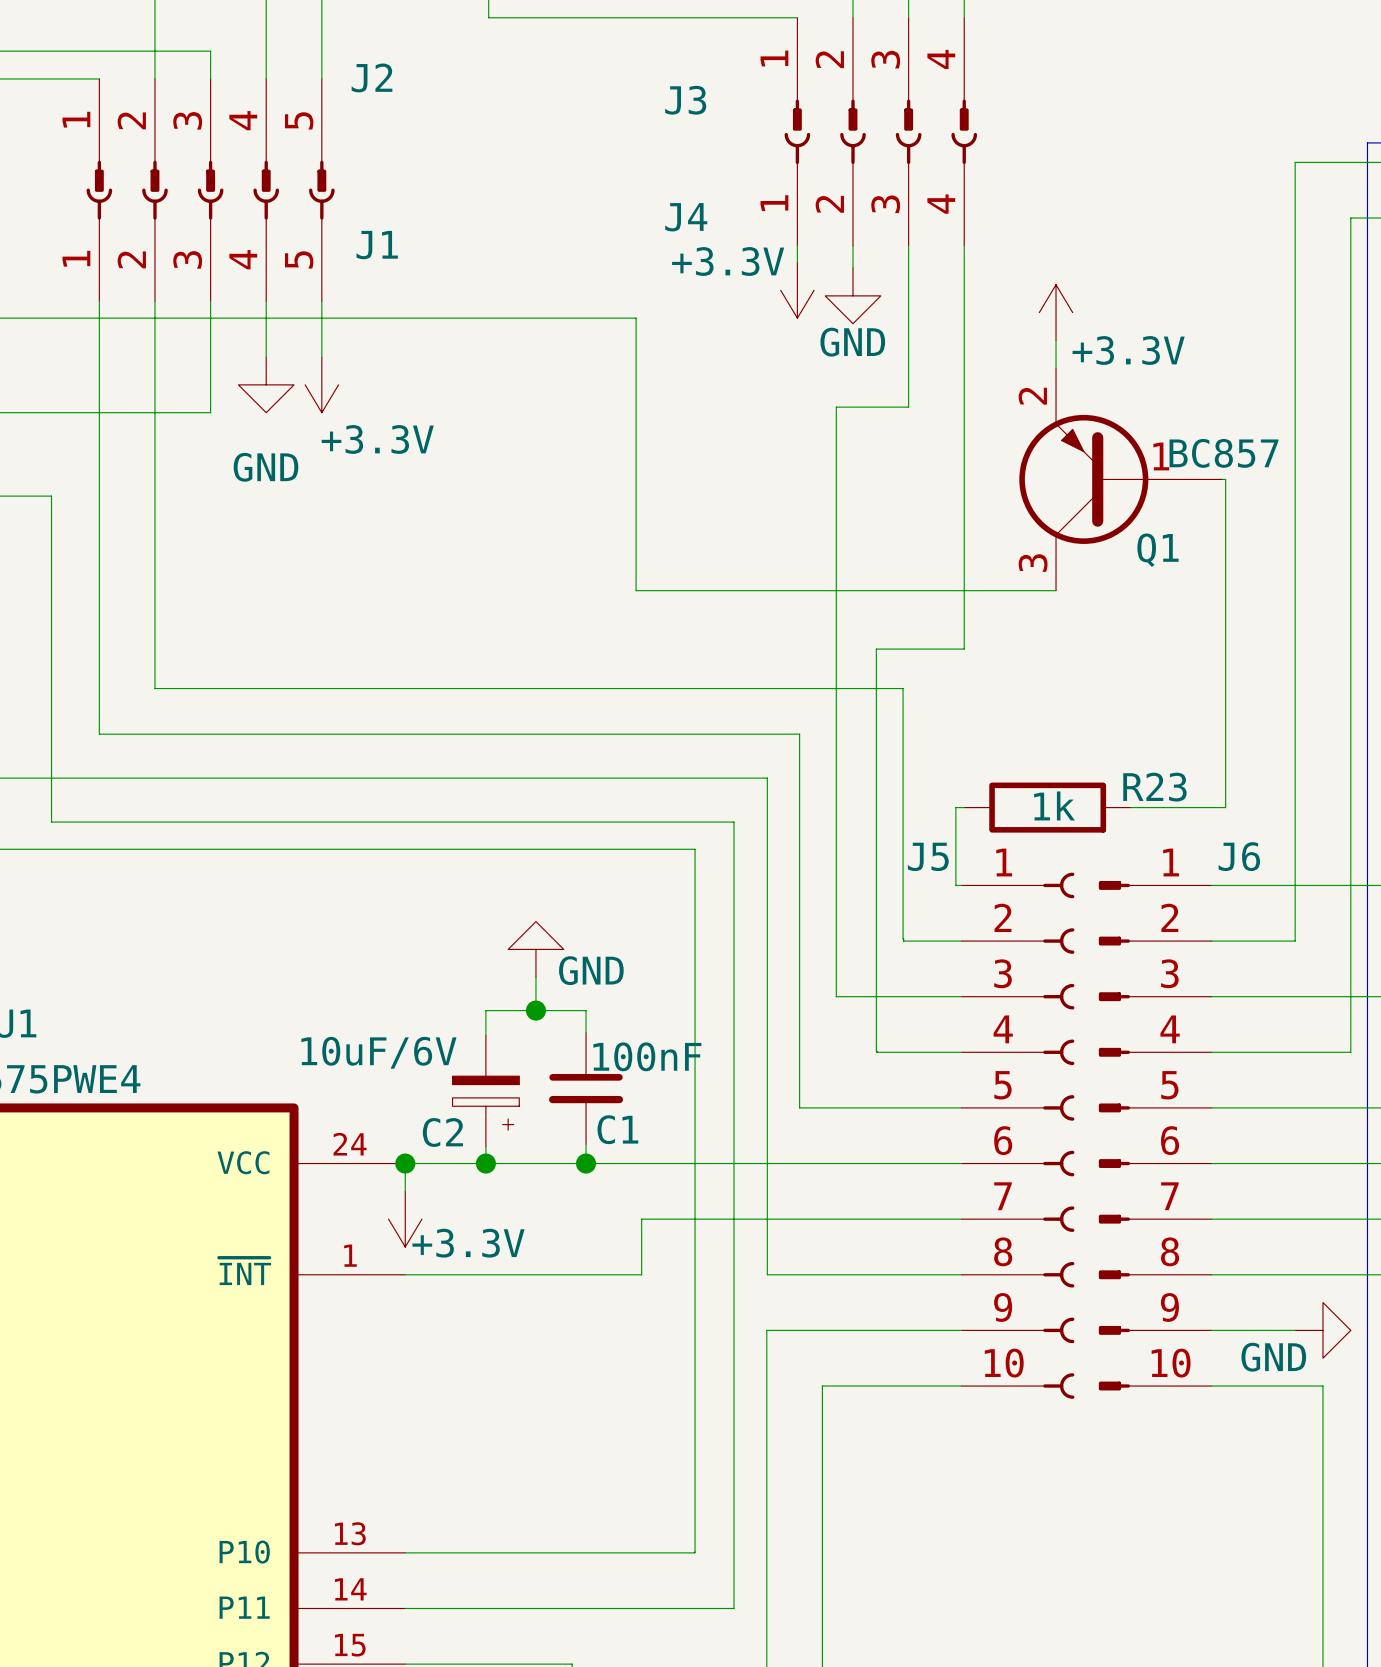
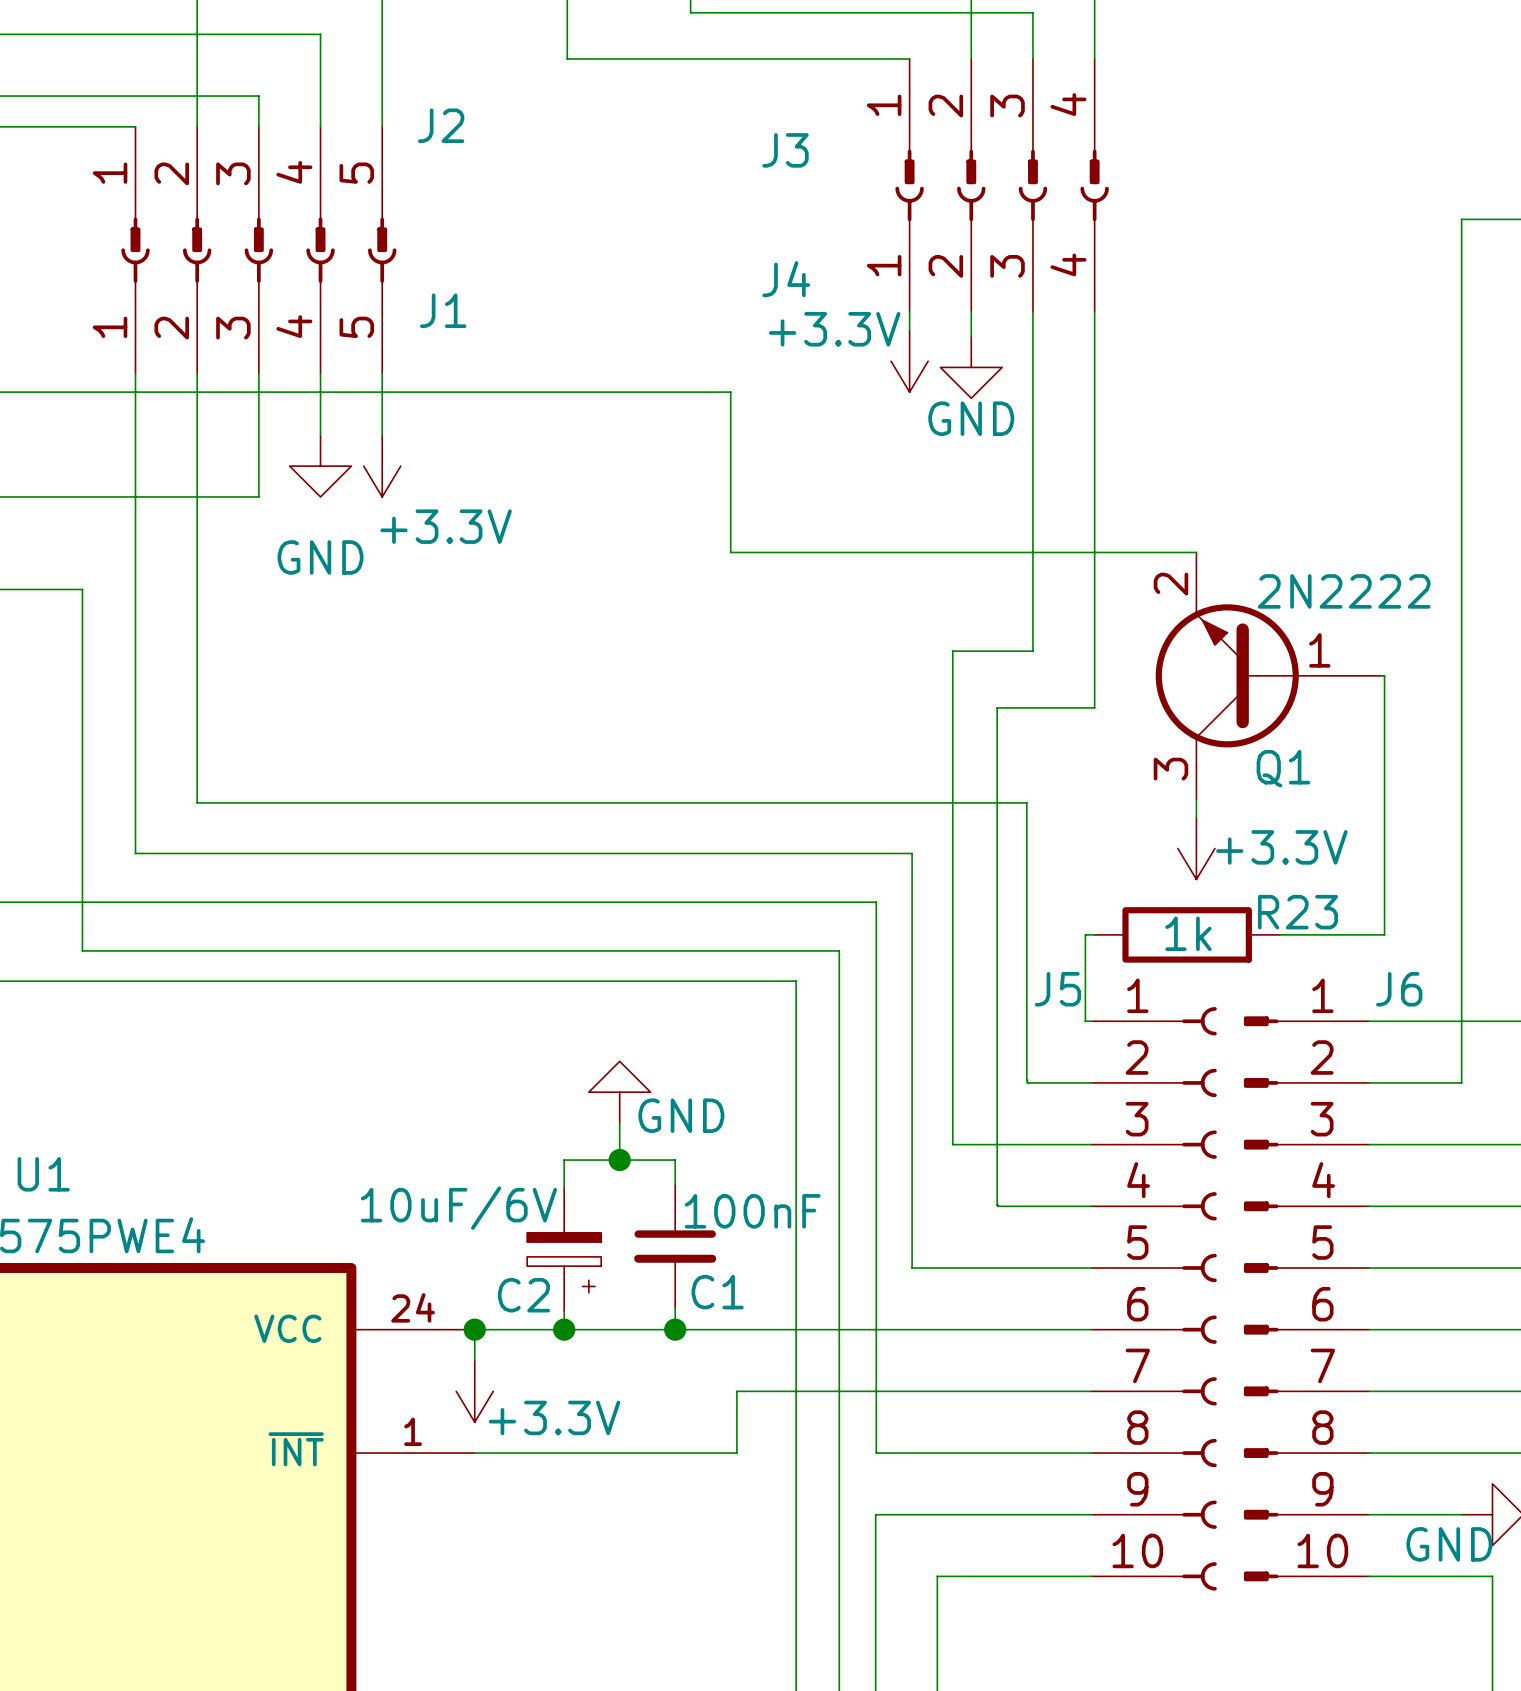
power symbol rotation: 0° (1056, 312) -> 180° (1196, 848)
power symbol position: +3.3V (1056, 312) -> +3.3V (1196, 848)
wire: (1056, 340) (1056, 368) -> none
Q1 symbol: [1019, 368, 1223, 591] -> [1155, 552, 1382, 800]
wire: (908, 407) (836, 407) (836, 551) -> (1032, 490) (1032, 651) (952, 651)
Q1 value: BC857 (1223, 453) -> 2N2222 (1344, 591)
wire: (636, 462) (636, 590) (1056, 590) -> (730, 552) (1196, 552)
wire: (1222, 479) (1225, 479) (1225, 573) -> (1381, 675) (1384, 675)
wire: (964, 602) (964, 649) (876, 649) -> (1094, 707) (997, 707) (997, 759)
wire: none -> (1196, 799) (1196, 817)

